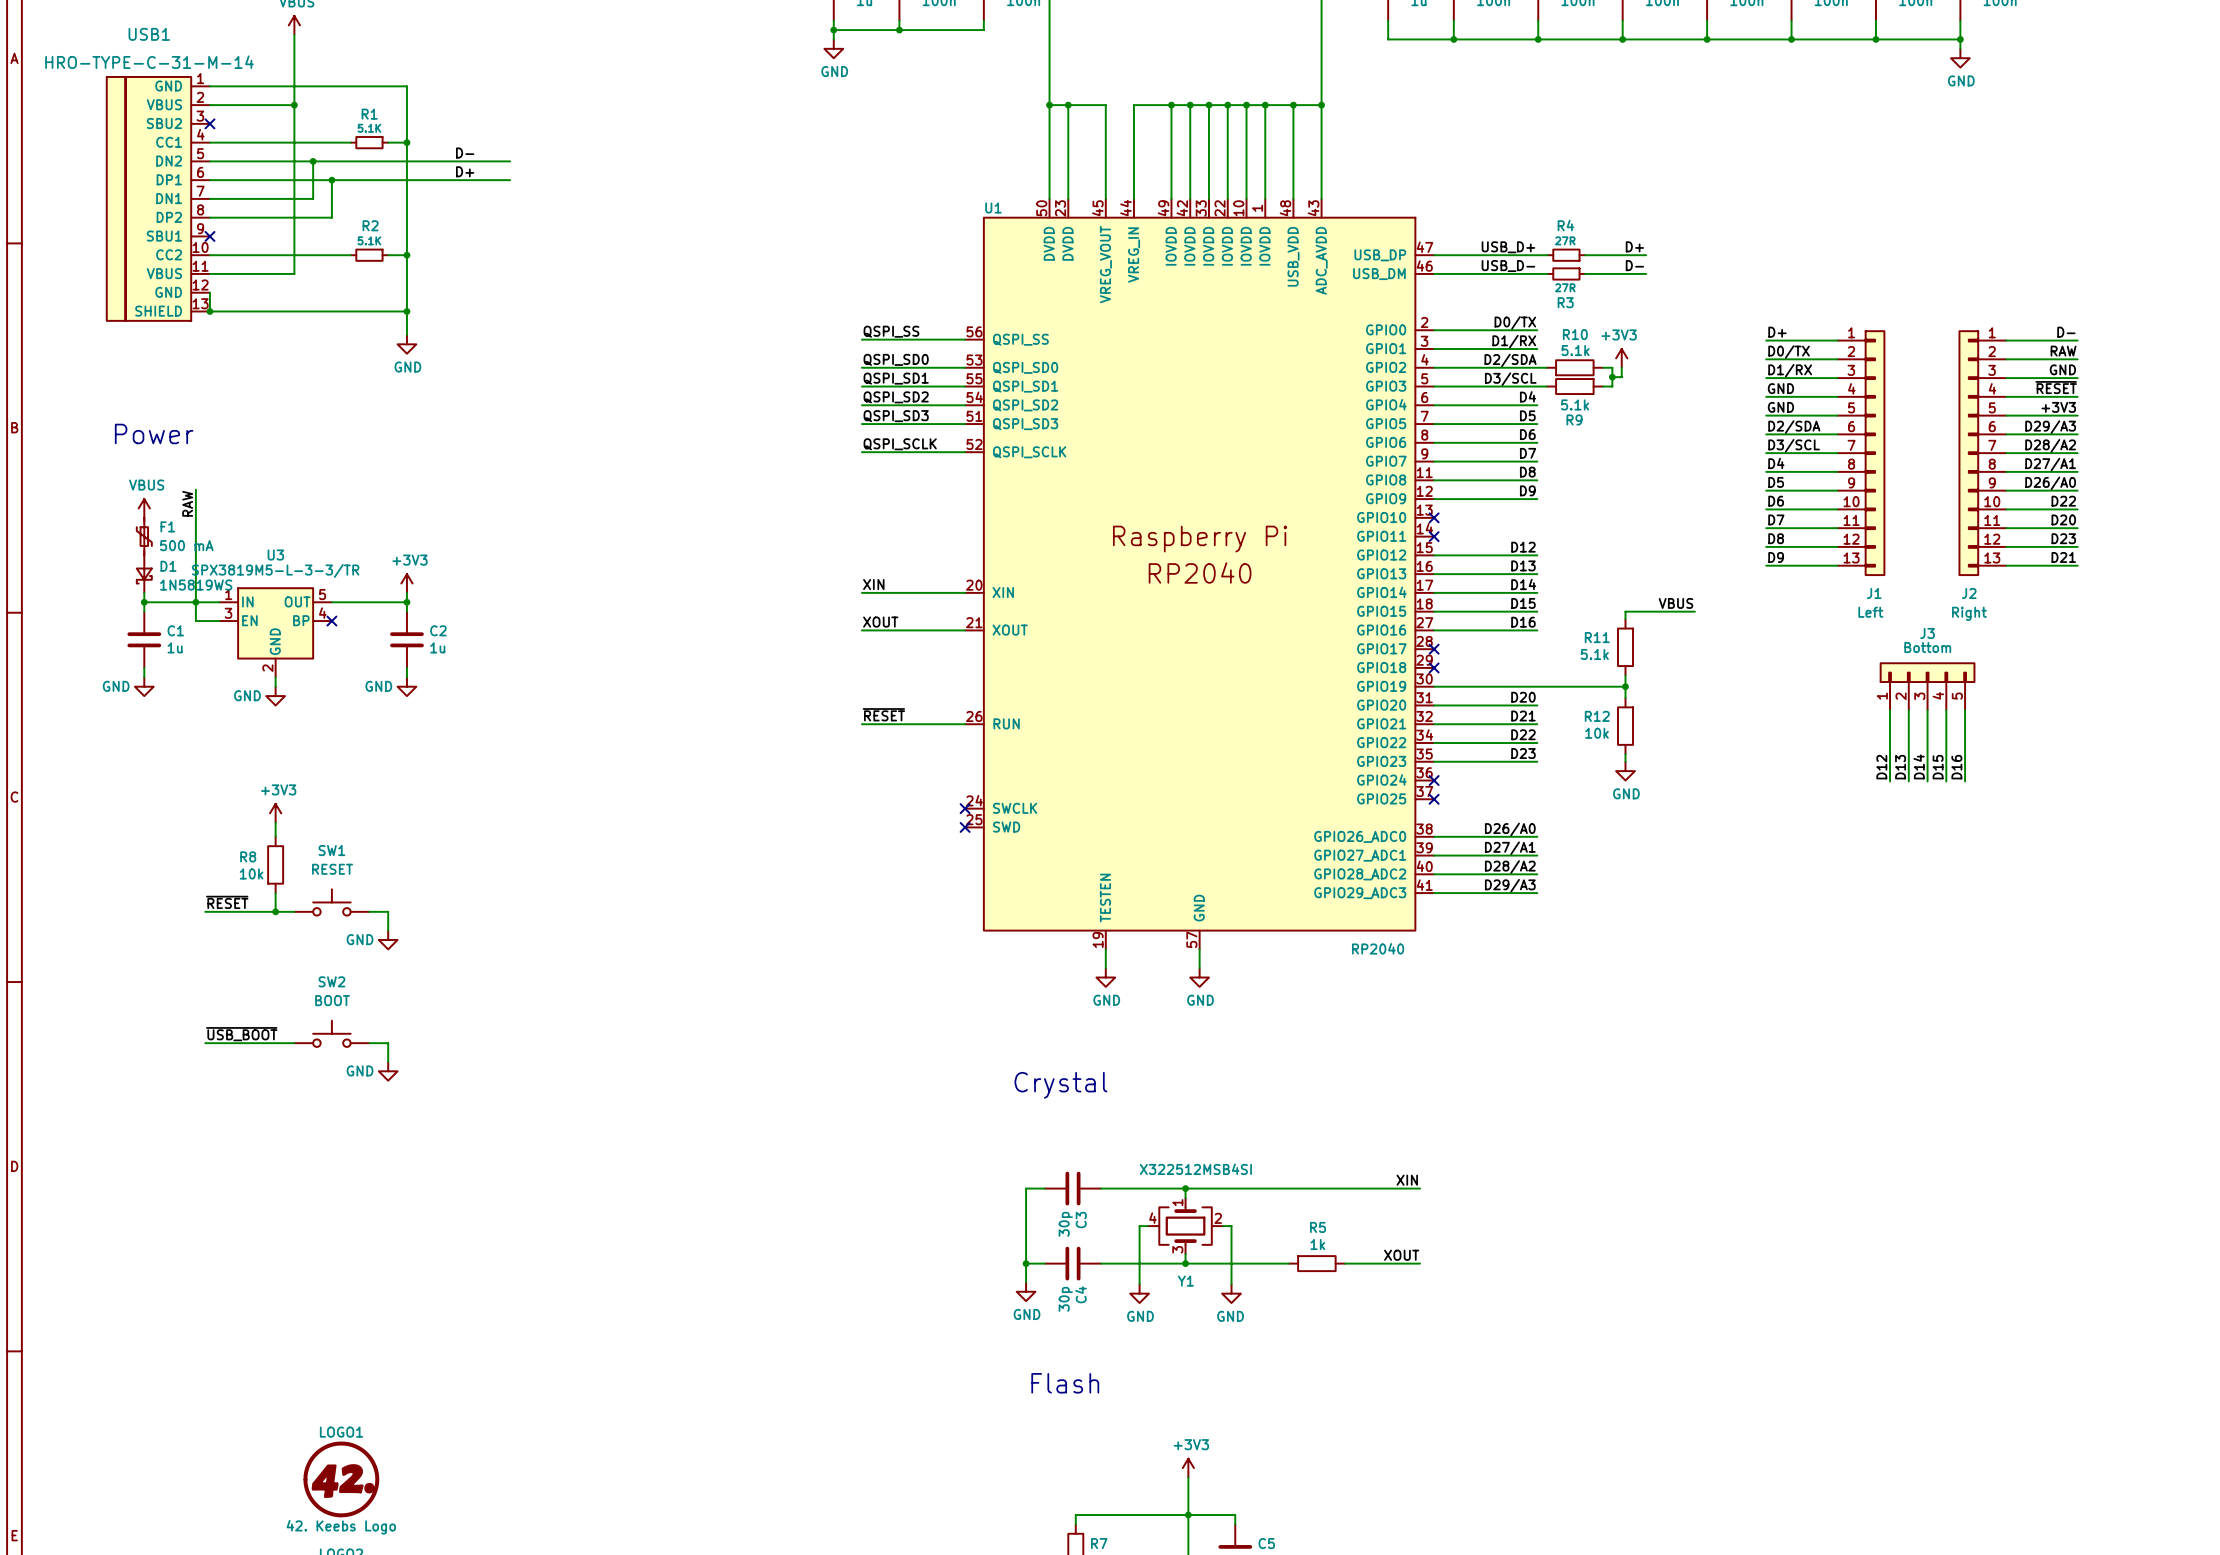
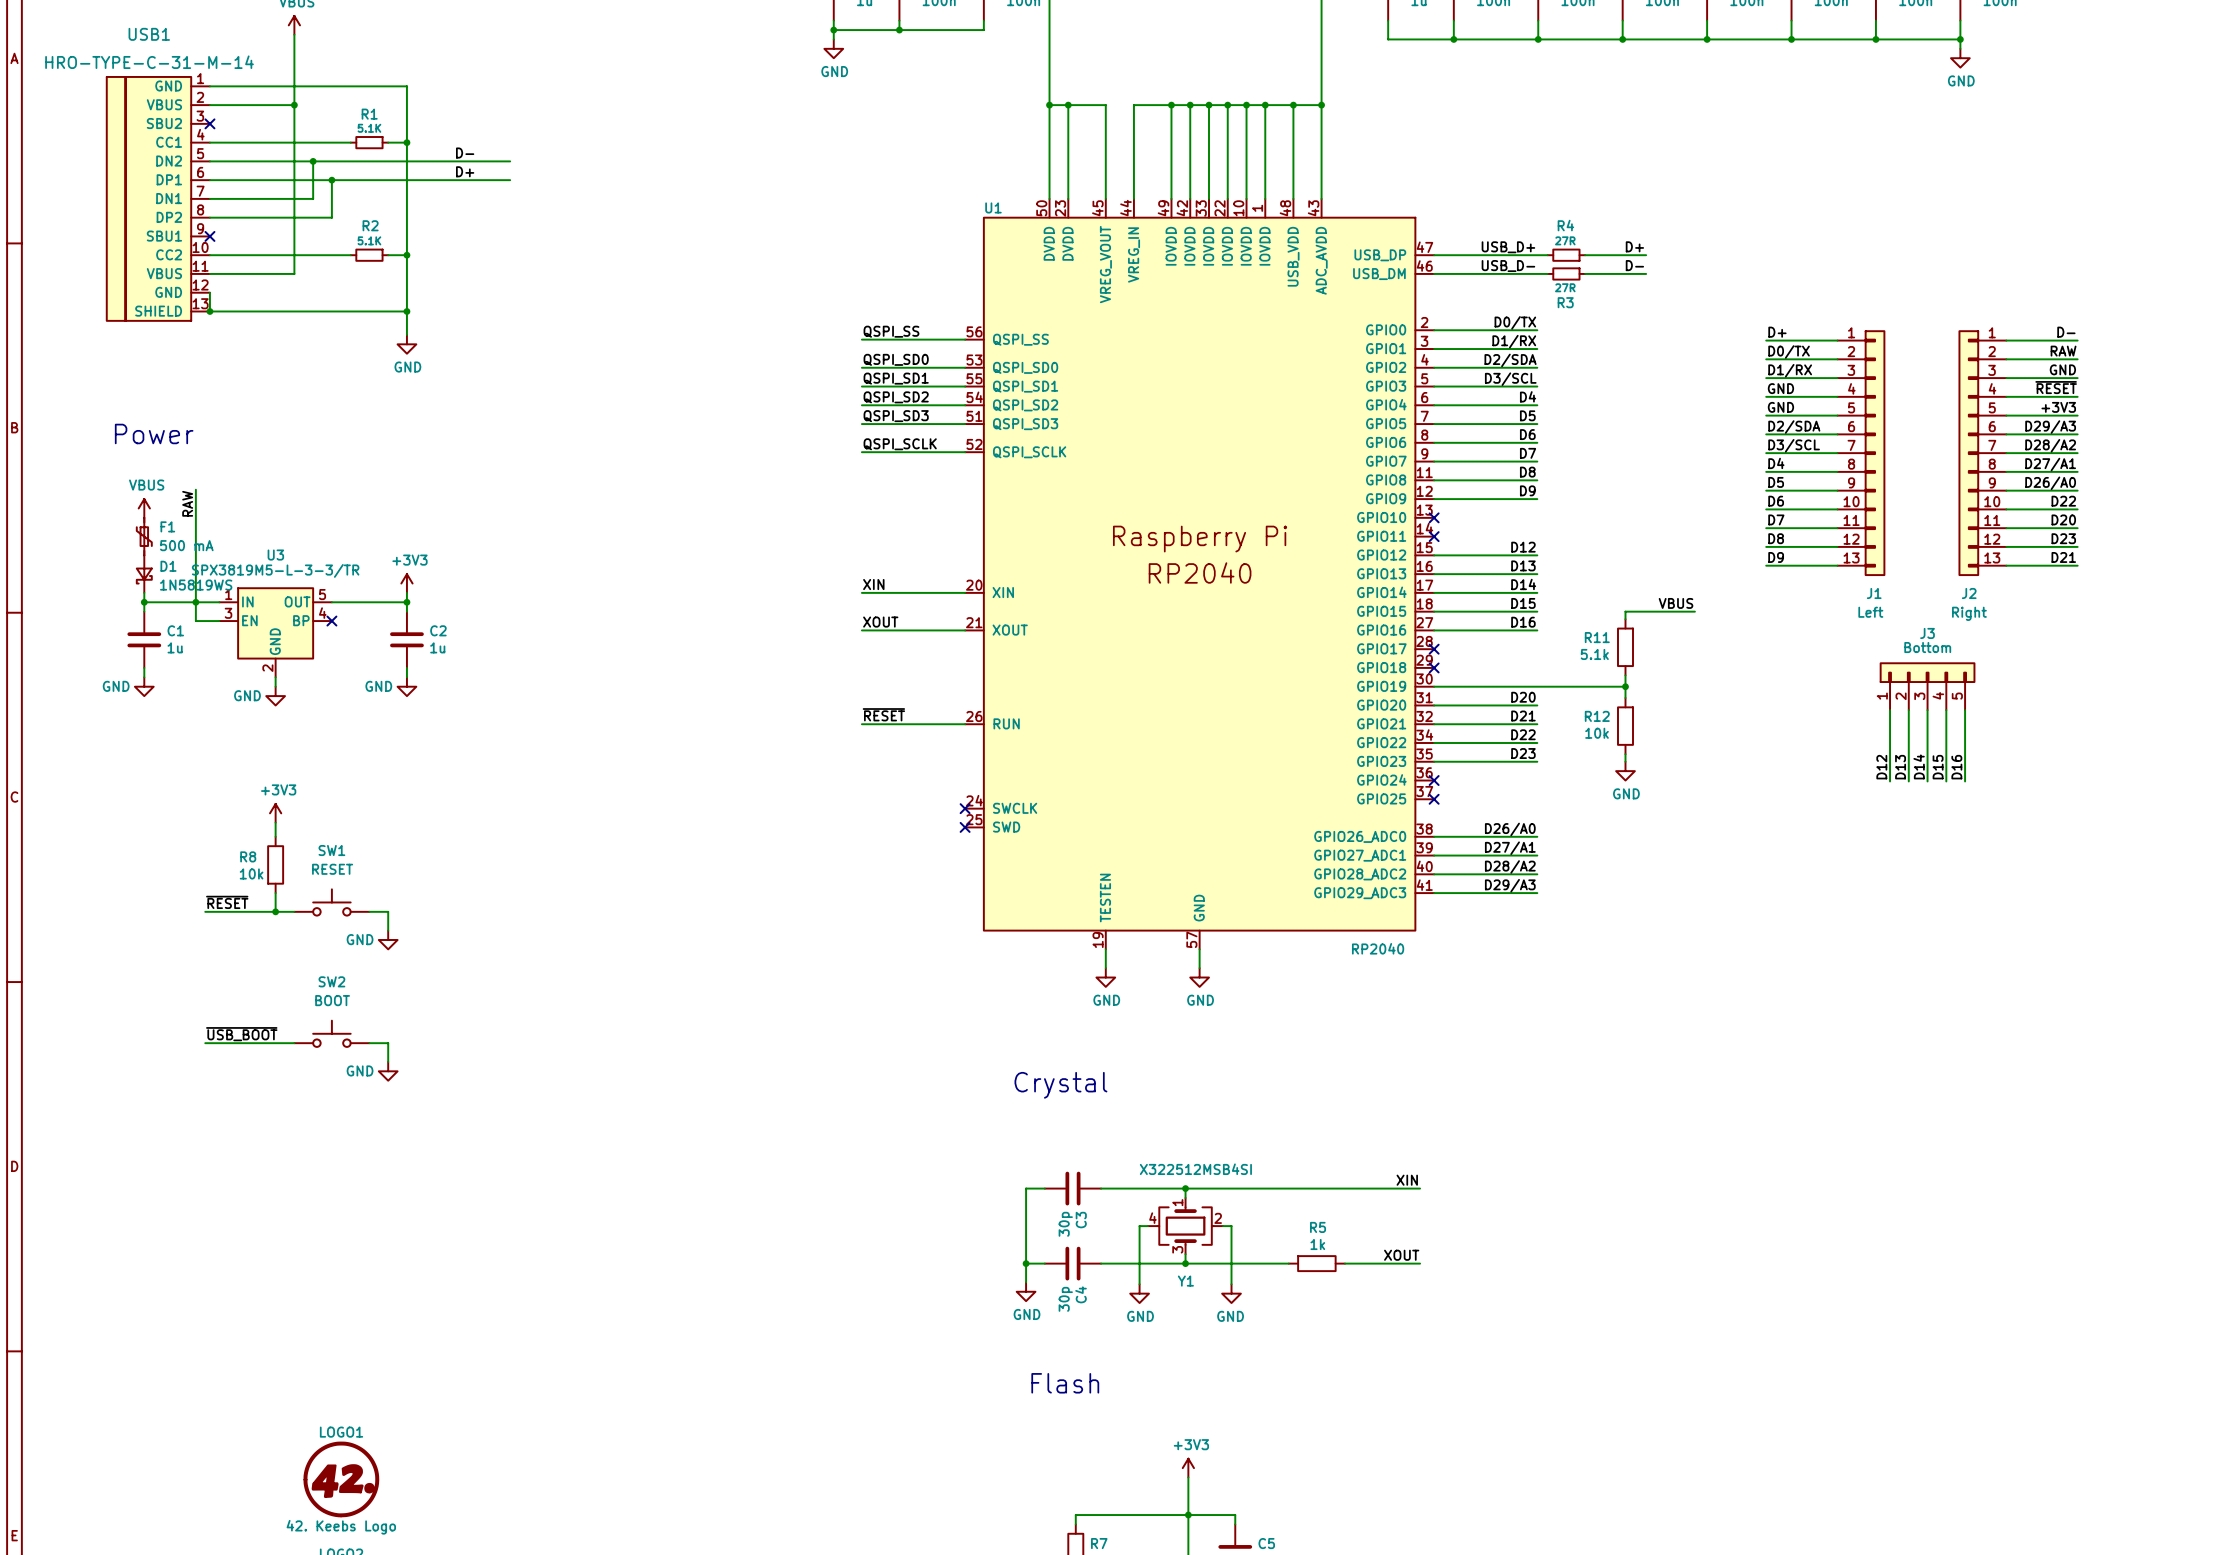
power symbol: +3V3 (1621, 358) -> none
wire: (1537, 367) (1546, 367) -> none
R10: 5.1k (1574, 367) -> none
wire: (1602, 367) (1612, 367) (1612, 386) (1602, 386) -> none
wire: (1621, 367) (1621, 377) (1612, 377) -> none
junction: (1612, 377) -> none
wire: (1537, 386) (1546, 386) -> none
R9: 5.1k (1574, 386) -> none

